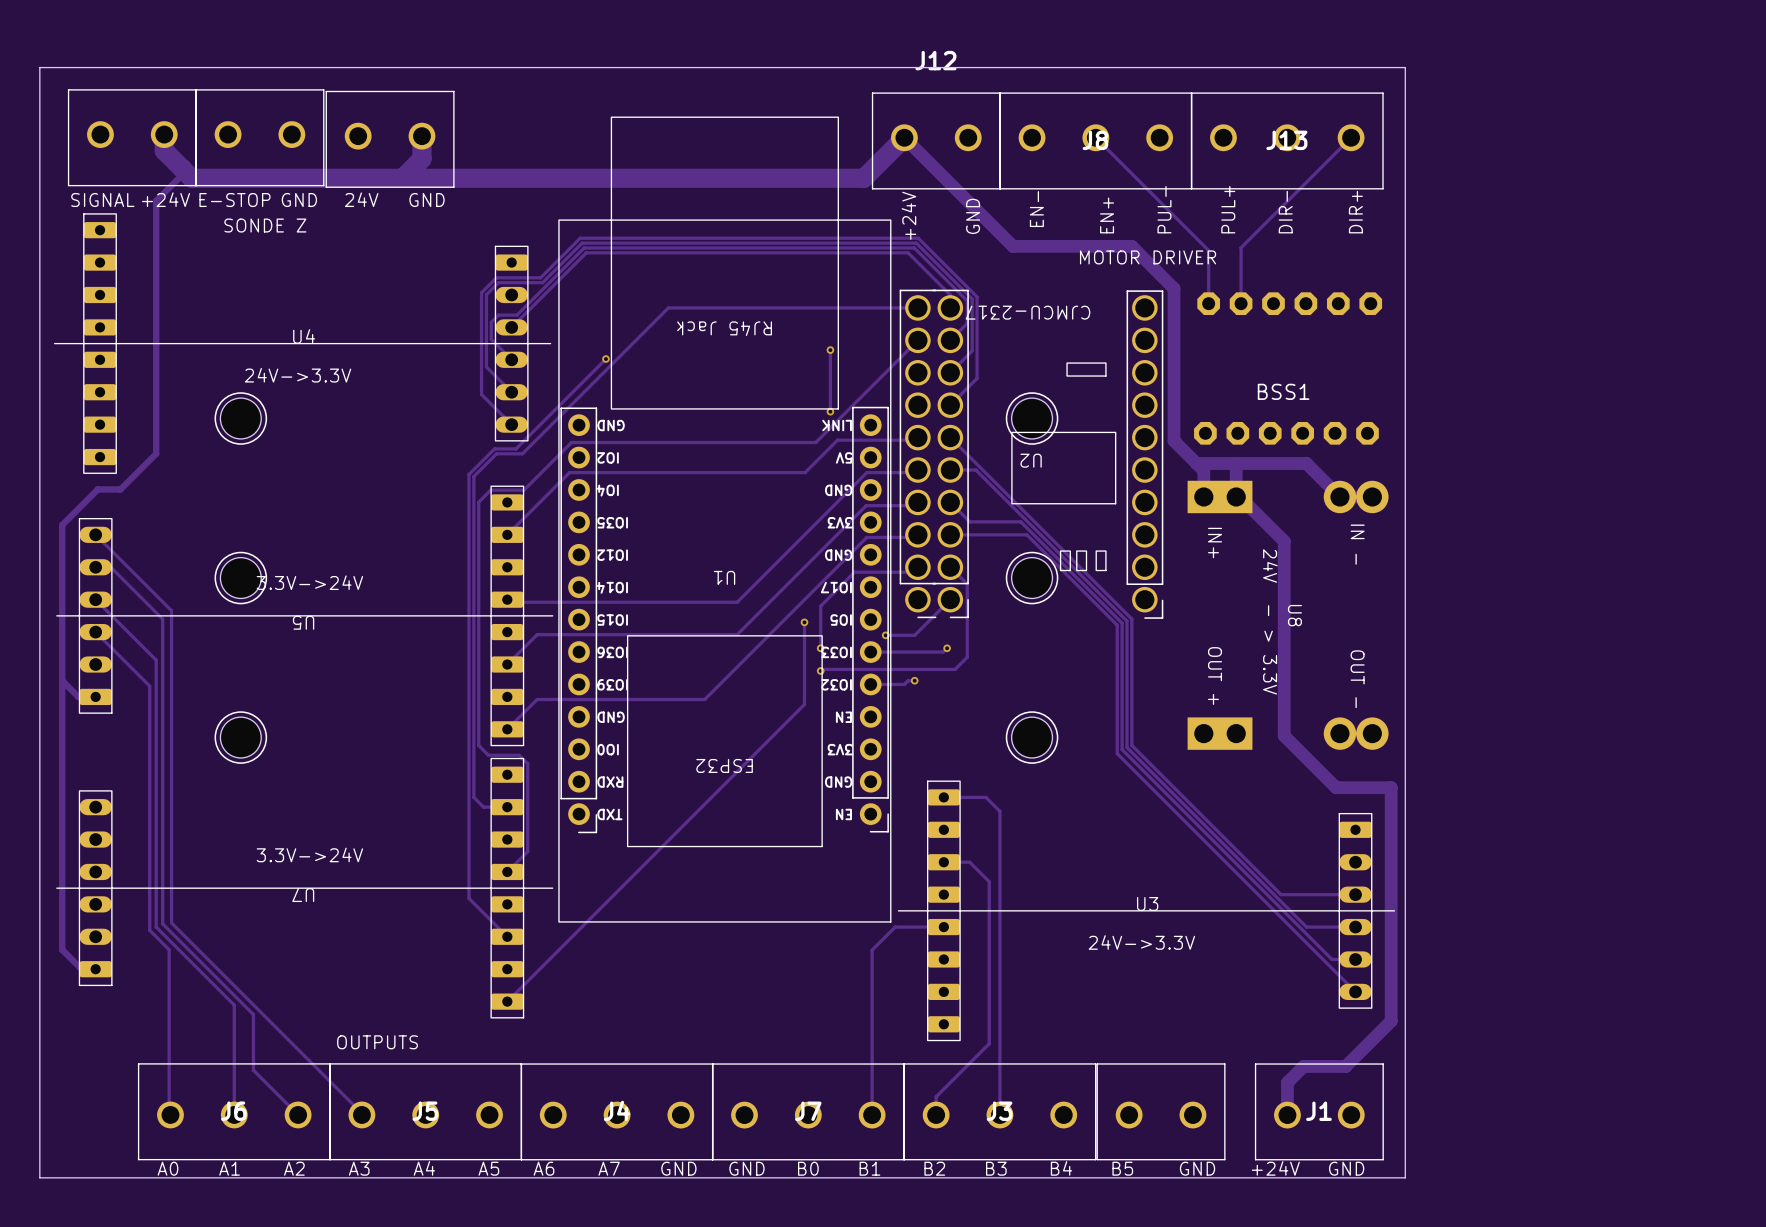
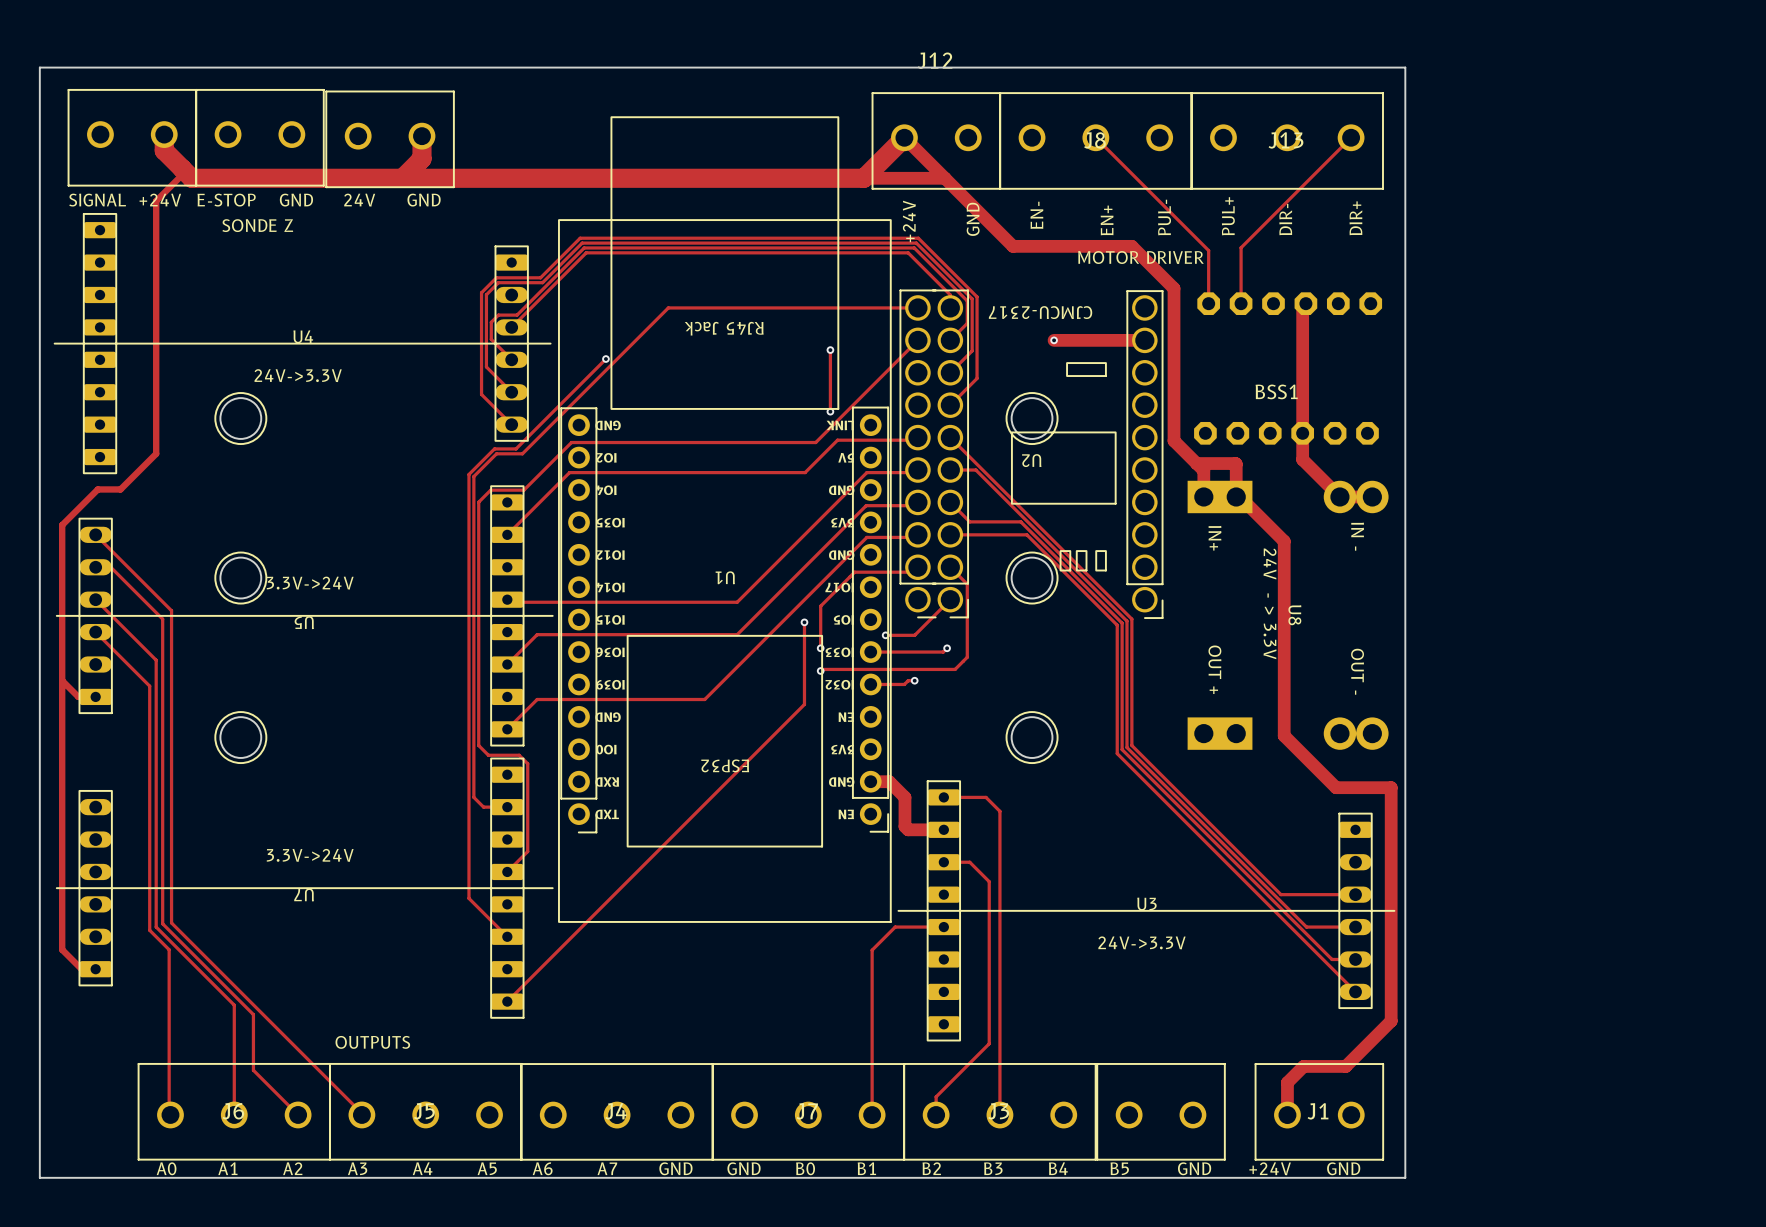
track: none -> (863, 178) (944, 178)
track: none -> (1054, 340) (1144, 340)
via: none -> (1054, 340)
track: (1235, 463) (1306, 463) -> (1305, 303) (1302, 306) (1302, 459) (1306, 463)
track: none -> (870, 781) (889, 781) (904, 797) (904, 826) (908, 829) (943, 829)

